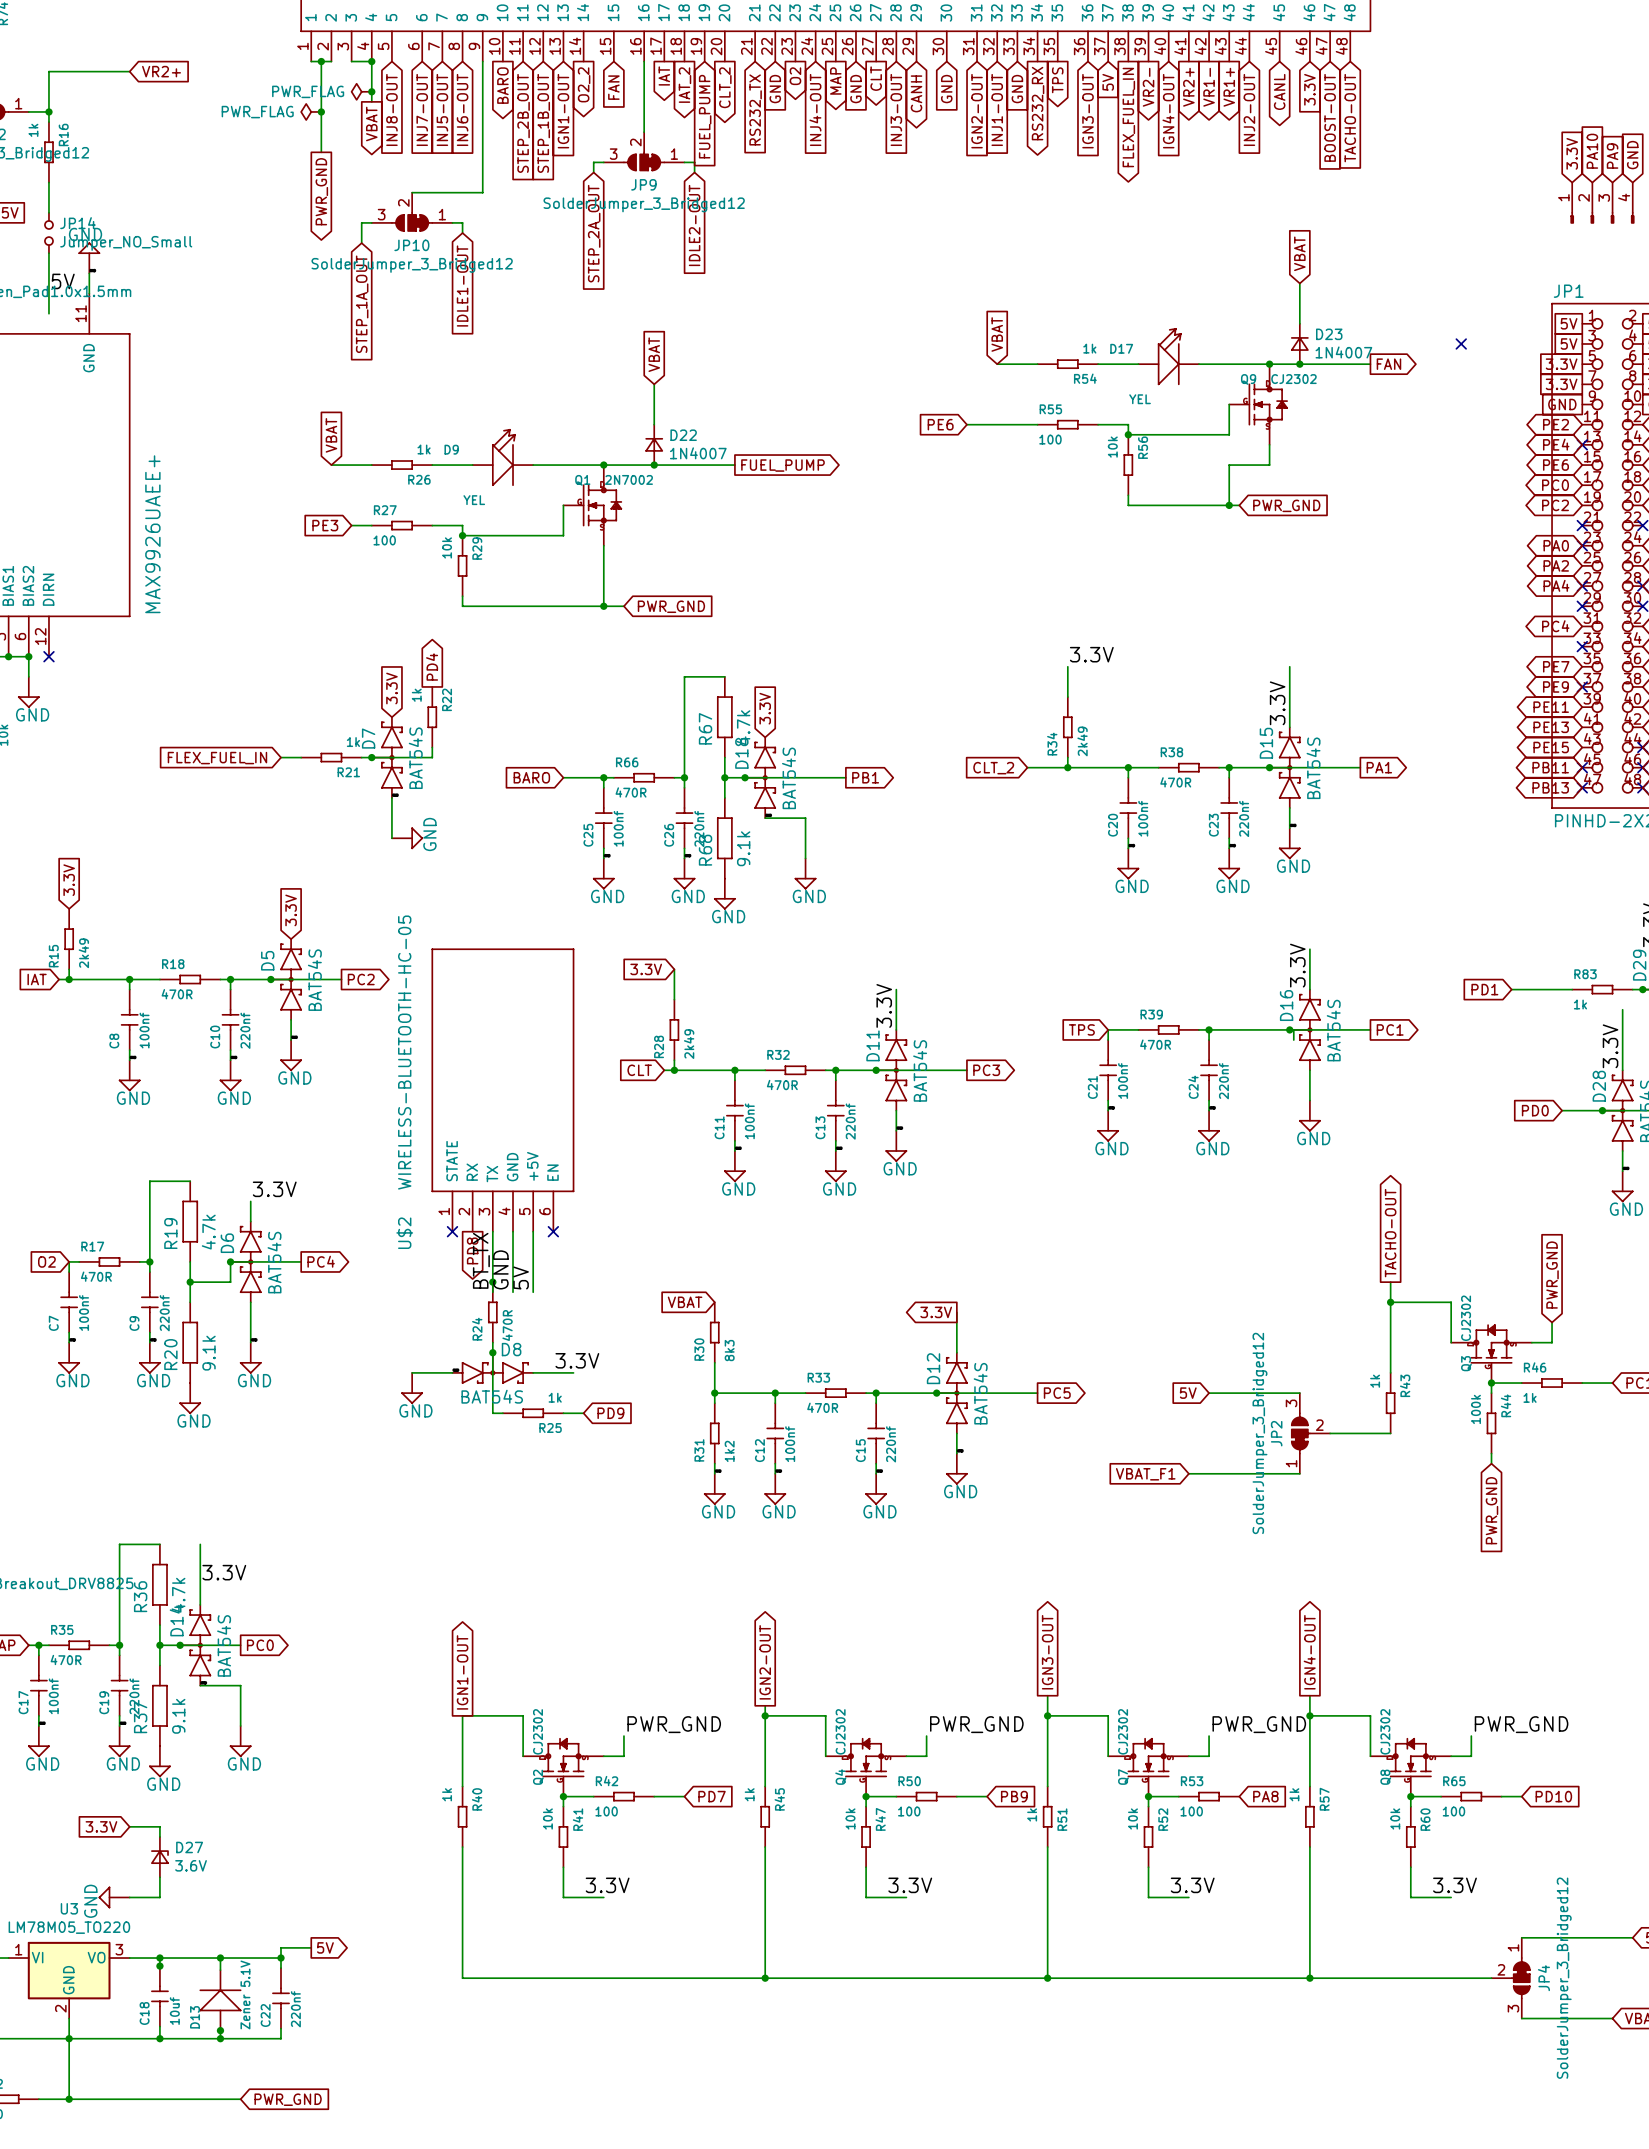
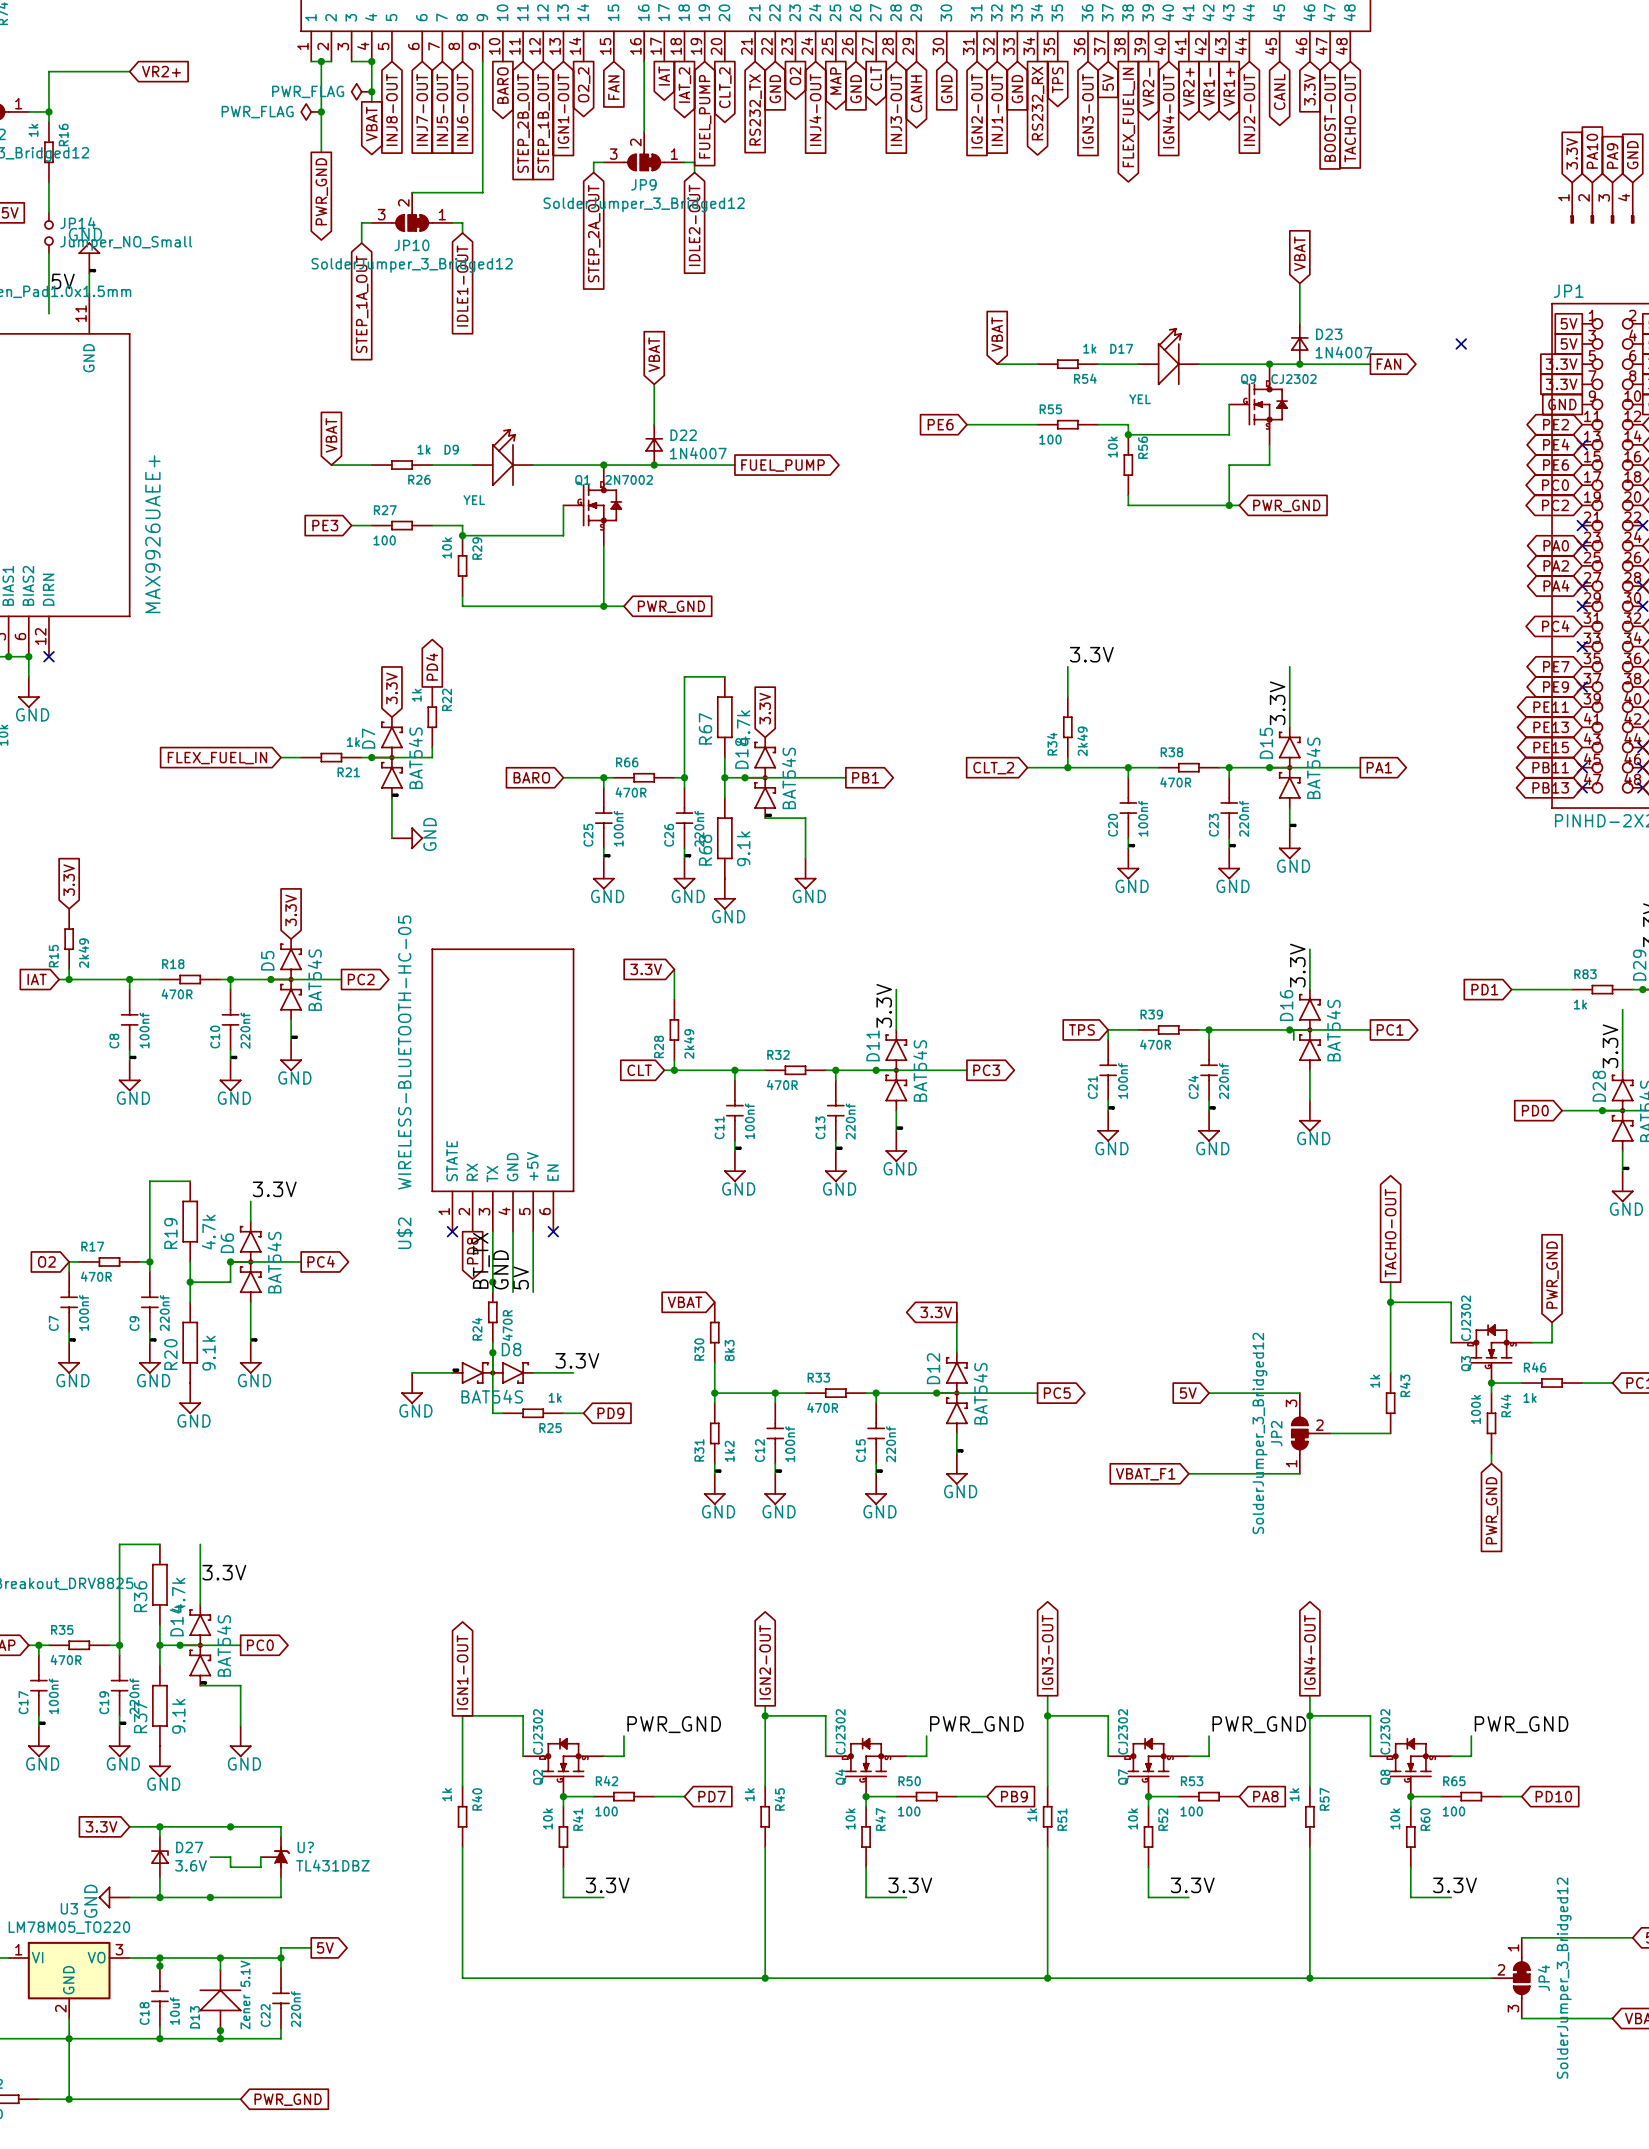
wire: none -> (159, 1826) (280, 1826) (280, 1836)
junction: none -> (159, 1826)
junction: none -> (230, 1826)
wire: none -> (210, 1857) (230, 1857) (230, 1867) (260, 1867) (260, 1857)
U?: none -> TL431DBZ (275, 1857)
wire: none -> (280, 1877) (280, 1897) (159, 1897)
junction: none -> (159, 1897)
junction: none -> (210, 1897)

